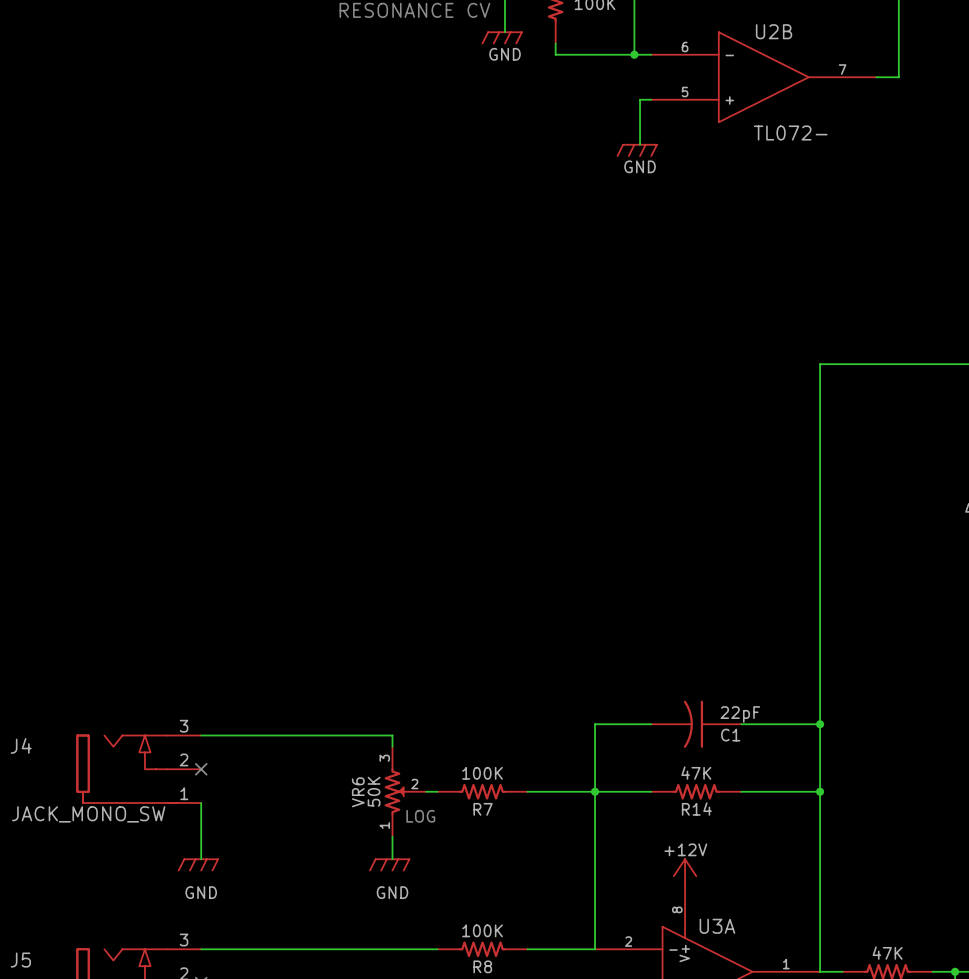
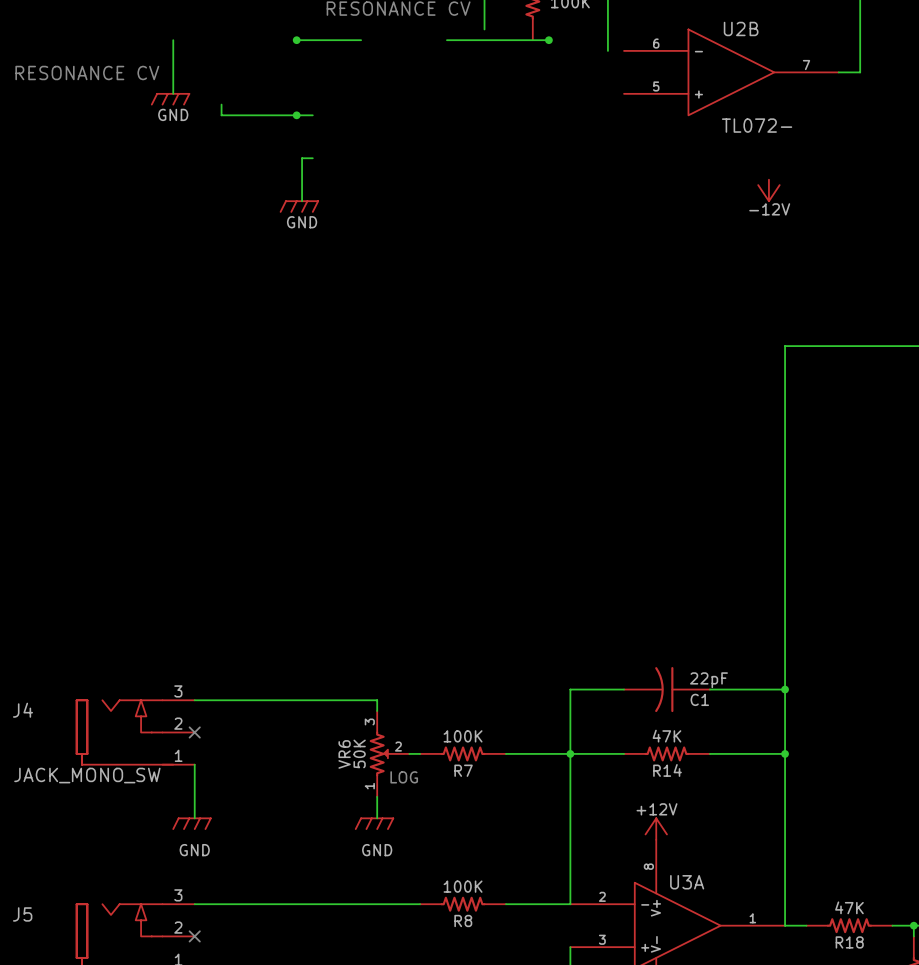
power symbol: GND (502, 37) -> none
wire: none -> (173, 40) (173, 93)
wire: none -> (296, 40) (361, 40)
junction: none -> (296, 40)
wire: none -> (446, 40) (548, 40)
wire: (555, 43) (555, 54) (651, 54) -> none
junction: none -> (548, 40)
junction: (634, 54) -> none
text: none -> RESONANCE CV (87, 72)
wire: (651, 99) (640, 99) (640, 144) -> none
power symbol: none -> GND (170, 99)
wire: none -> (221, 104) (221, 115) (312, 115)
junction: none -> (296, 115)
power symbol: GND (637, 150) -> none
wire: none -> (312, 158) (302, 158) (302, 201)
power symbol: none -> -12V (768, 190)
power symbol: none -> GND (299, 206)

